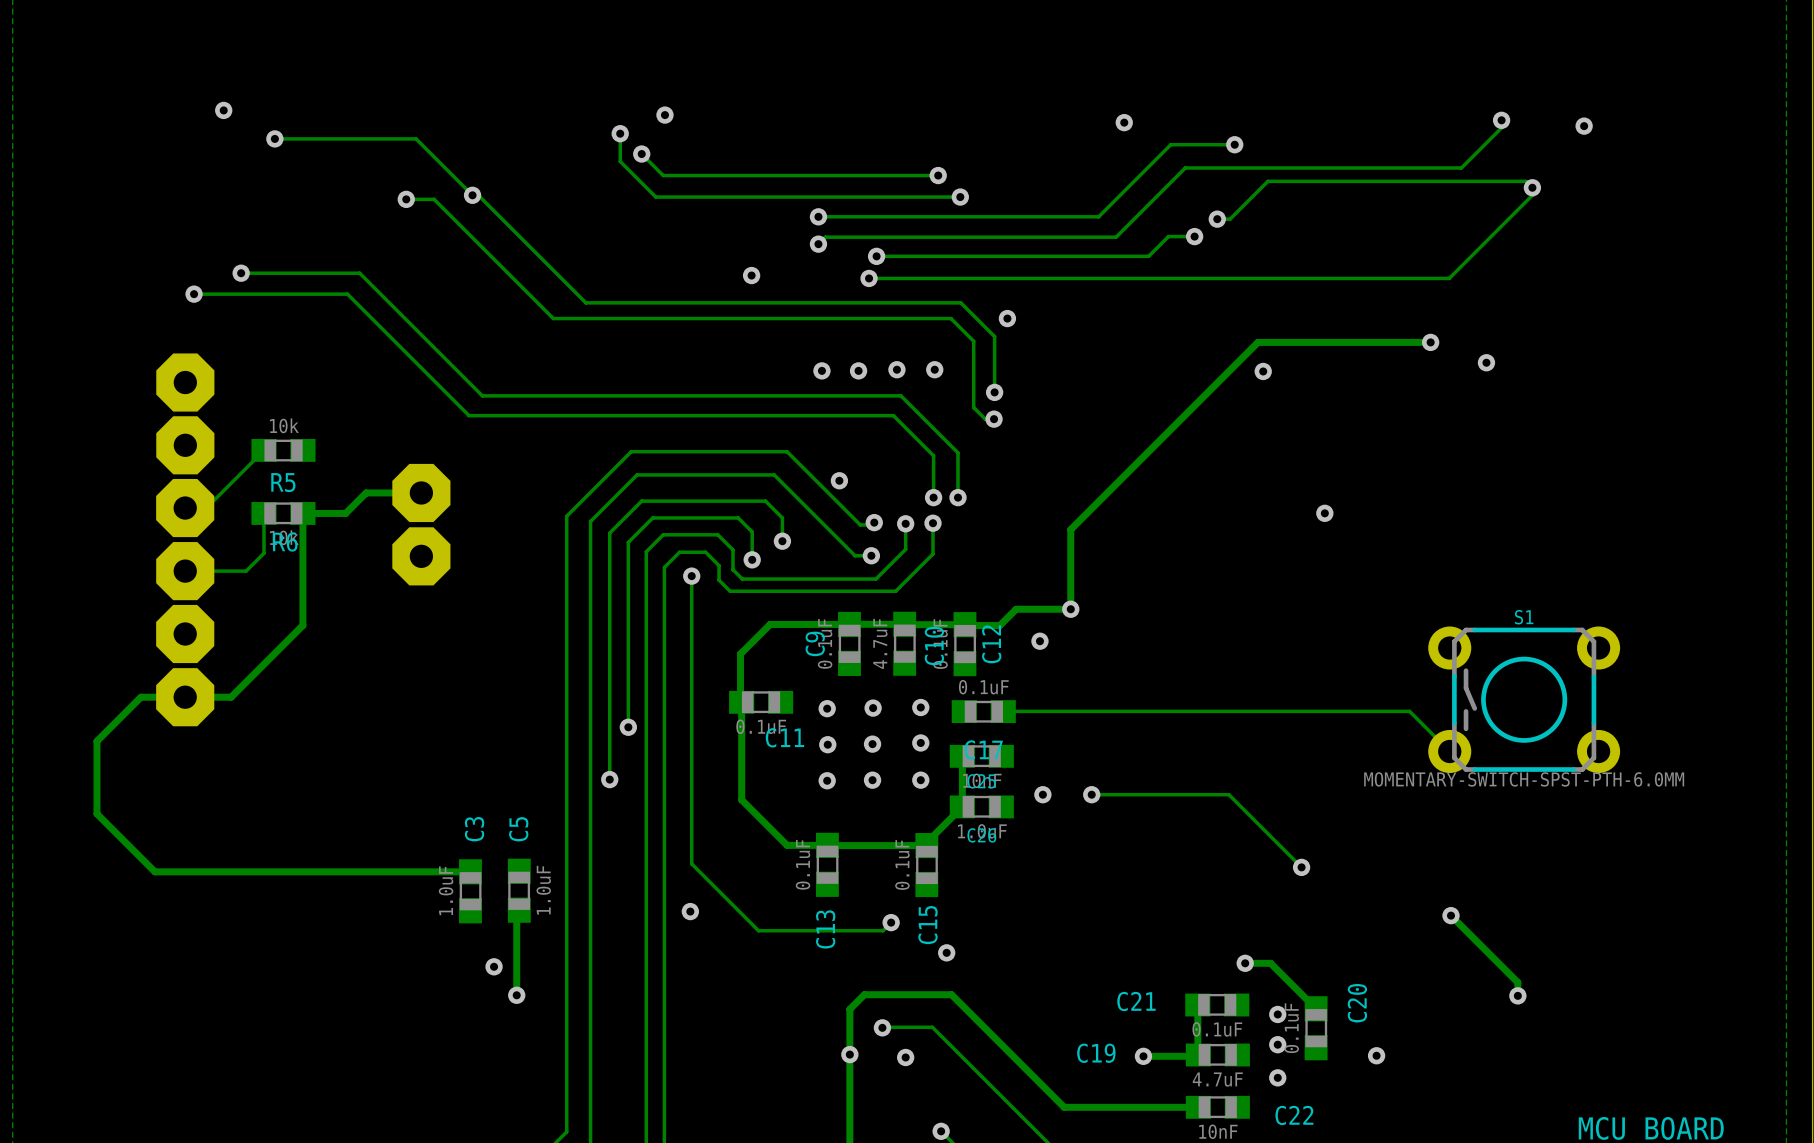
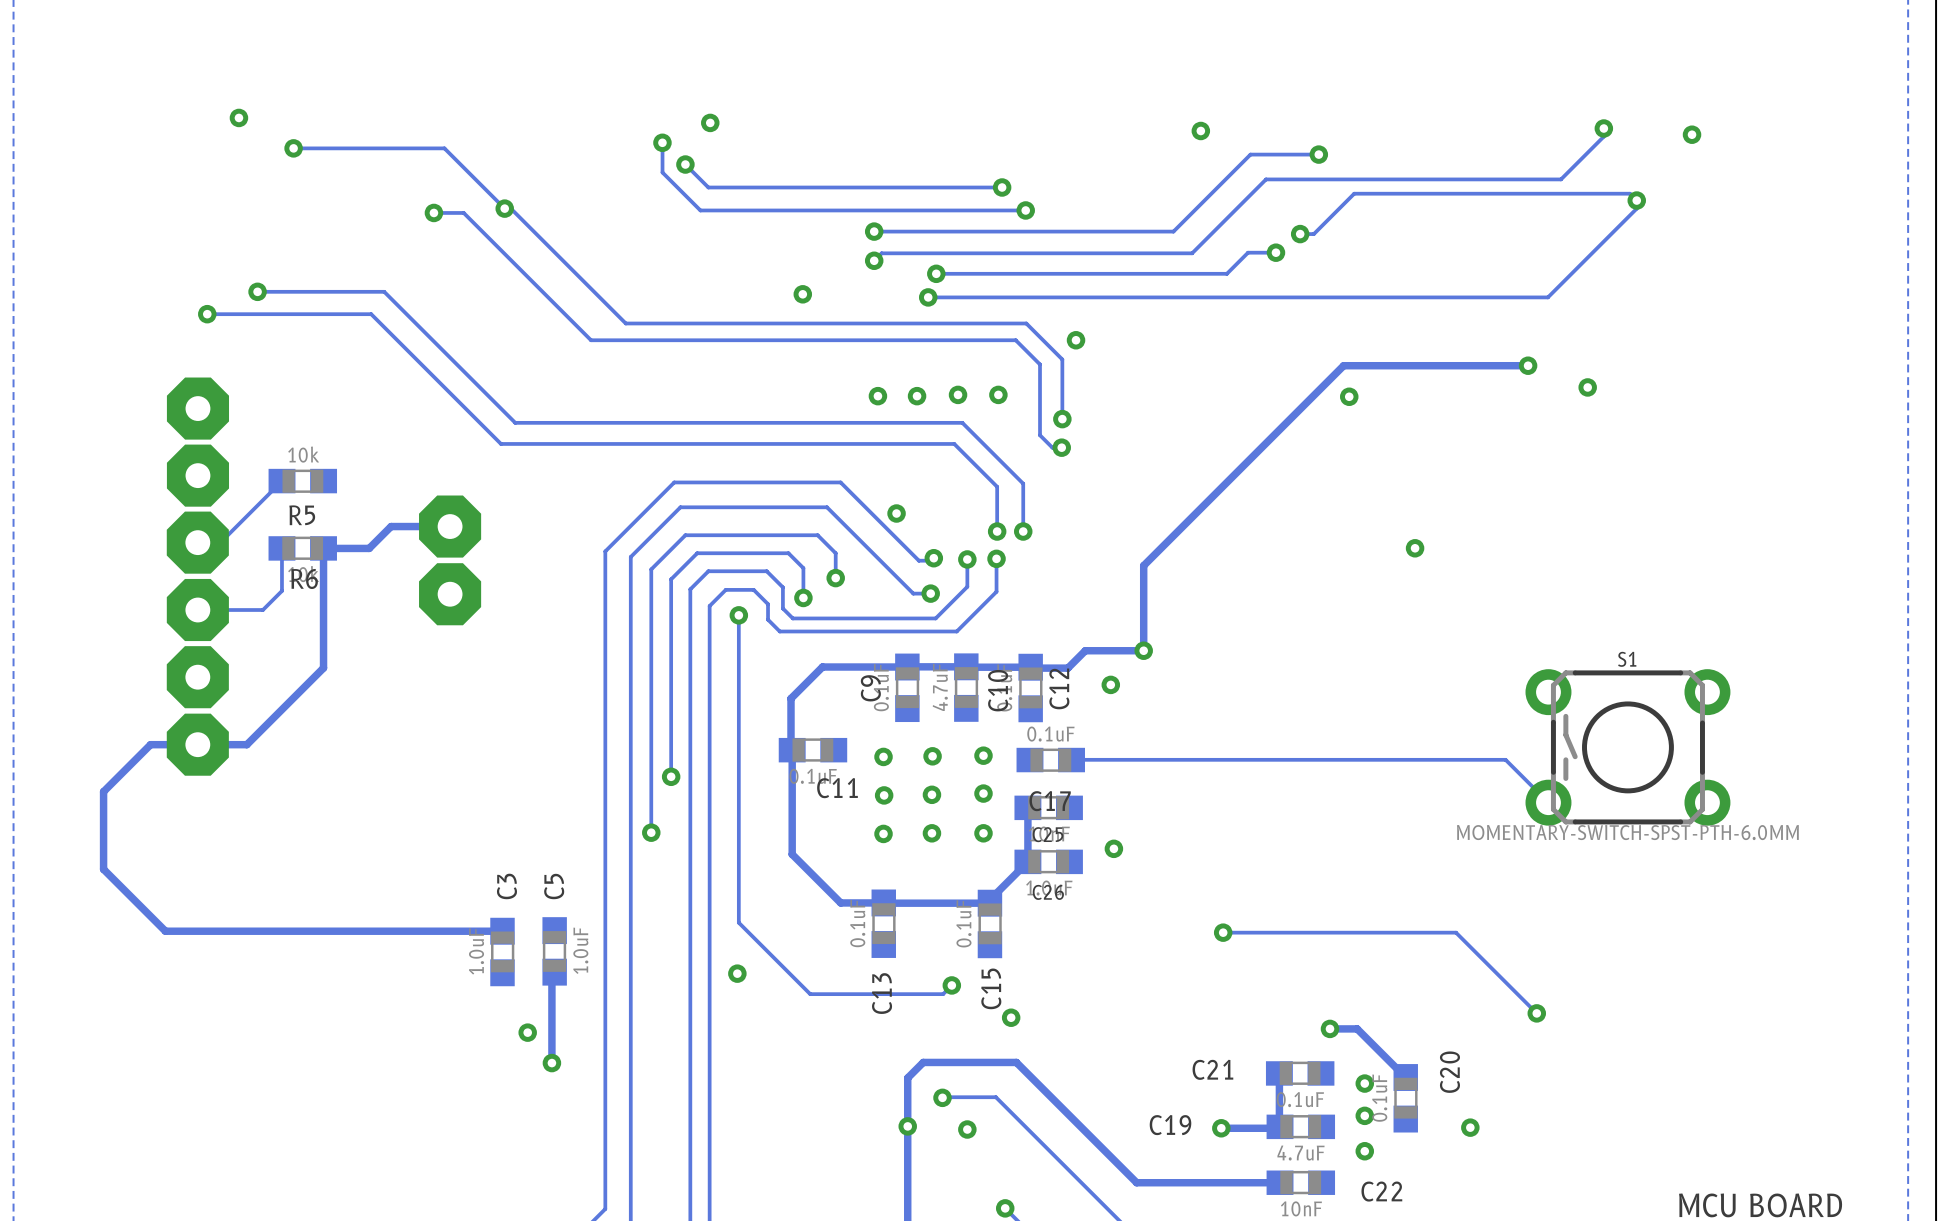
track: (1091, 794) (1228, 794) (1301, 867) -> none
via: (1091, 794) -> none
via: (1301, 867) -> none
track: none -> (1223, 932) (1456, 932) (1536, 1013)
via: none -> (1223, 932)
track: (1451, 915) (1517, 982) (1517, 995) -> none
via position: (1451, 915) -> (1536, 1013)
via: (1517, 995) -> none

